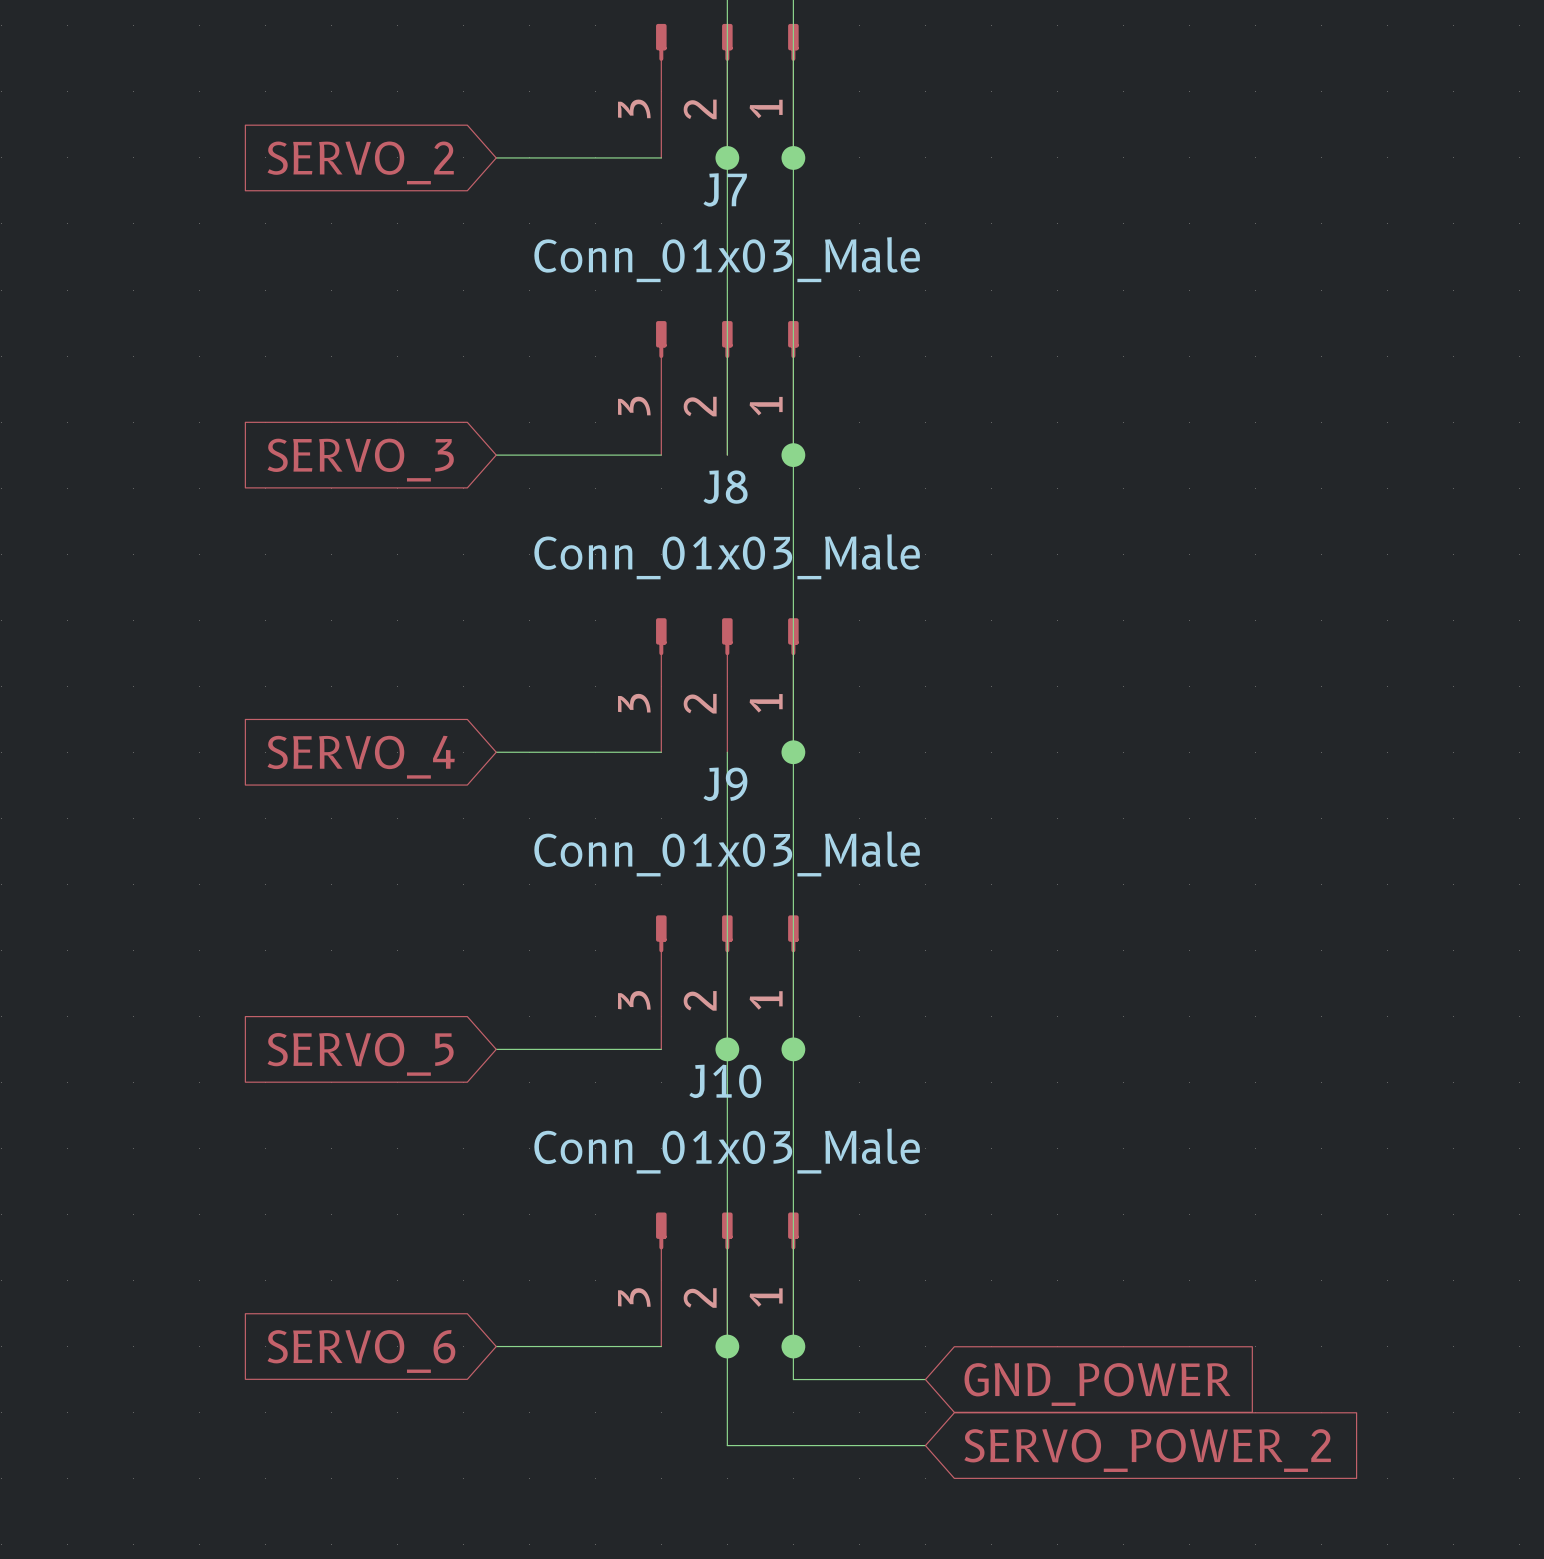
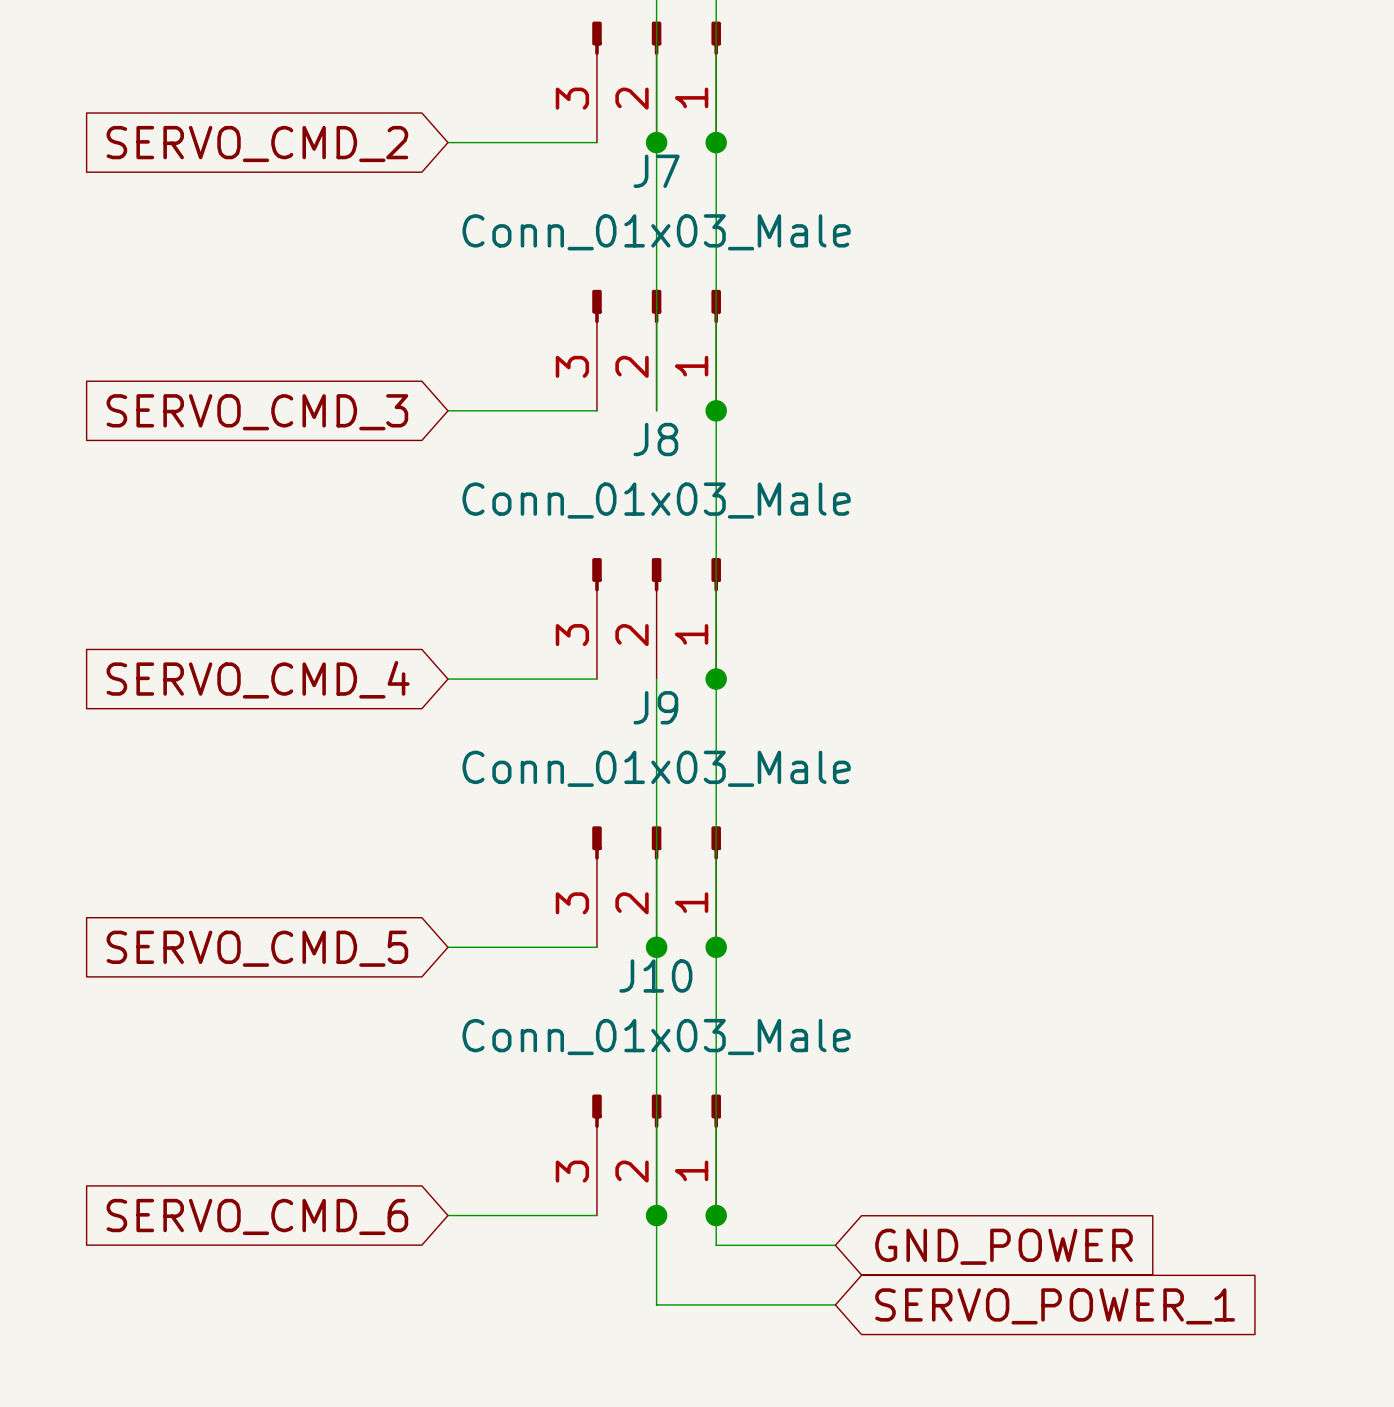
global label: SERVO_2 (360, 162) -> SERVO_CMD_2 (257, 144)
global label: SERVO_3 (360, 460) -> SERVO_CMD_3 (257, 412)
global label: SERVO_4 (361, 757) -> SERVO_CMD_4 (258, 679)
global label: SERVO_5 (360, 1054) -> SERVO_CMD_5 (257, 948)
global label: SERVO_6 (361, 1351) -> SERVO_CMD_6 (257, 1216)
global label: SERVO_POWER_2 (1147, 1450) -> SERVO_POWER_1 (1055, 1306)

